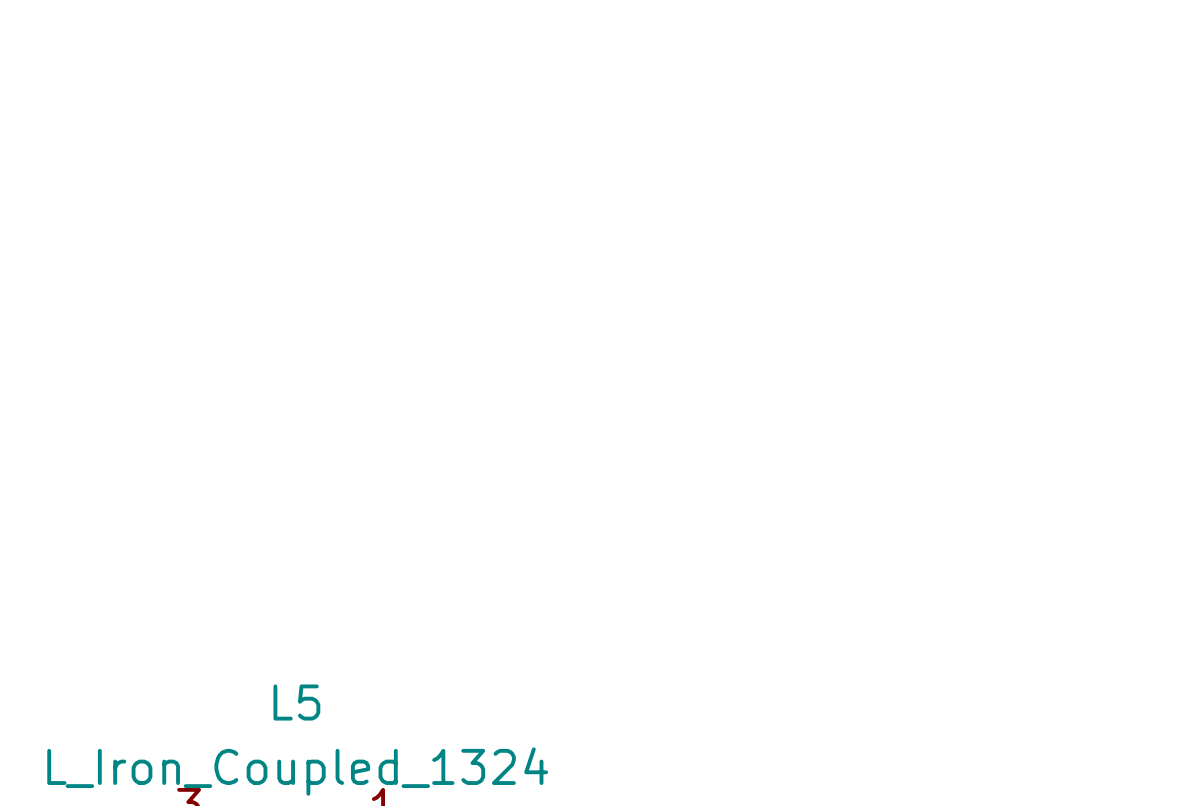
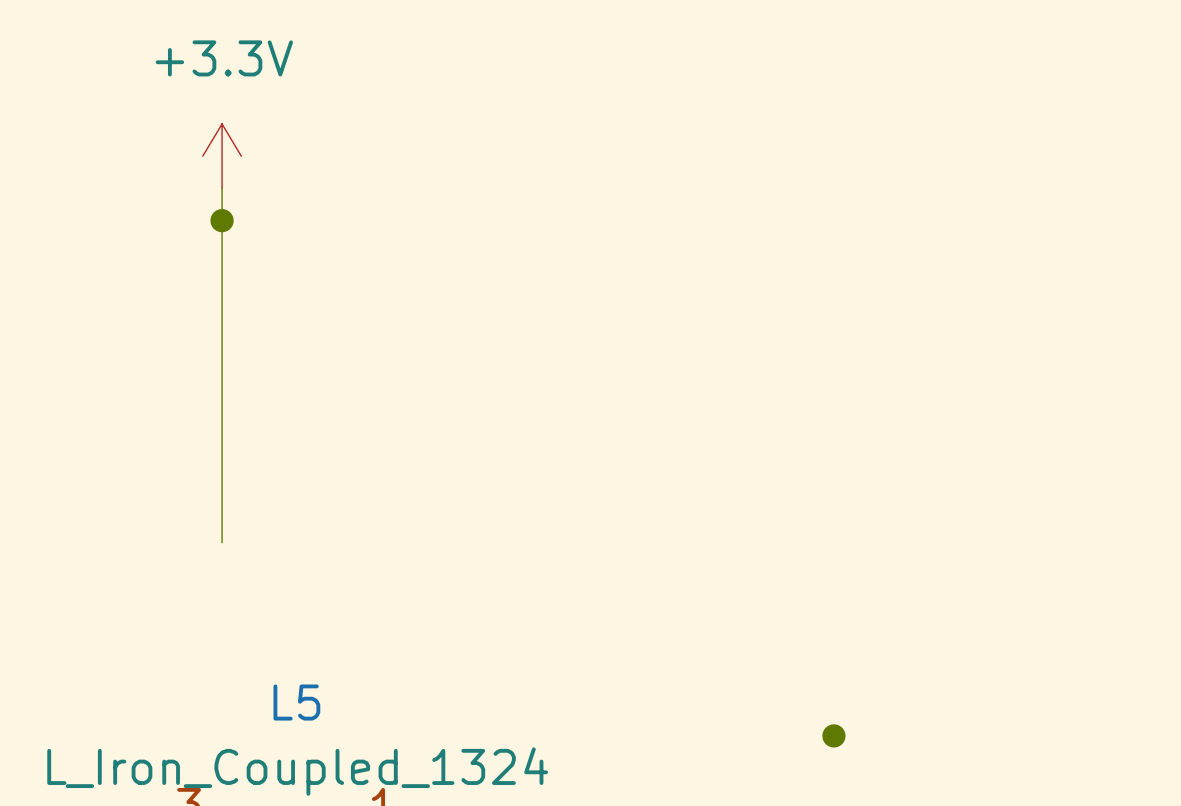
power symbol: none -> +3.3V (222, 156)
wire: none -> (222, 188) (222, 542)
junction: none -> (222, 220)
junction: none -> (833, 735)

